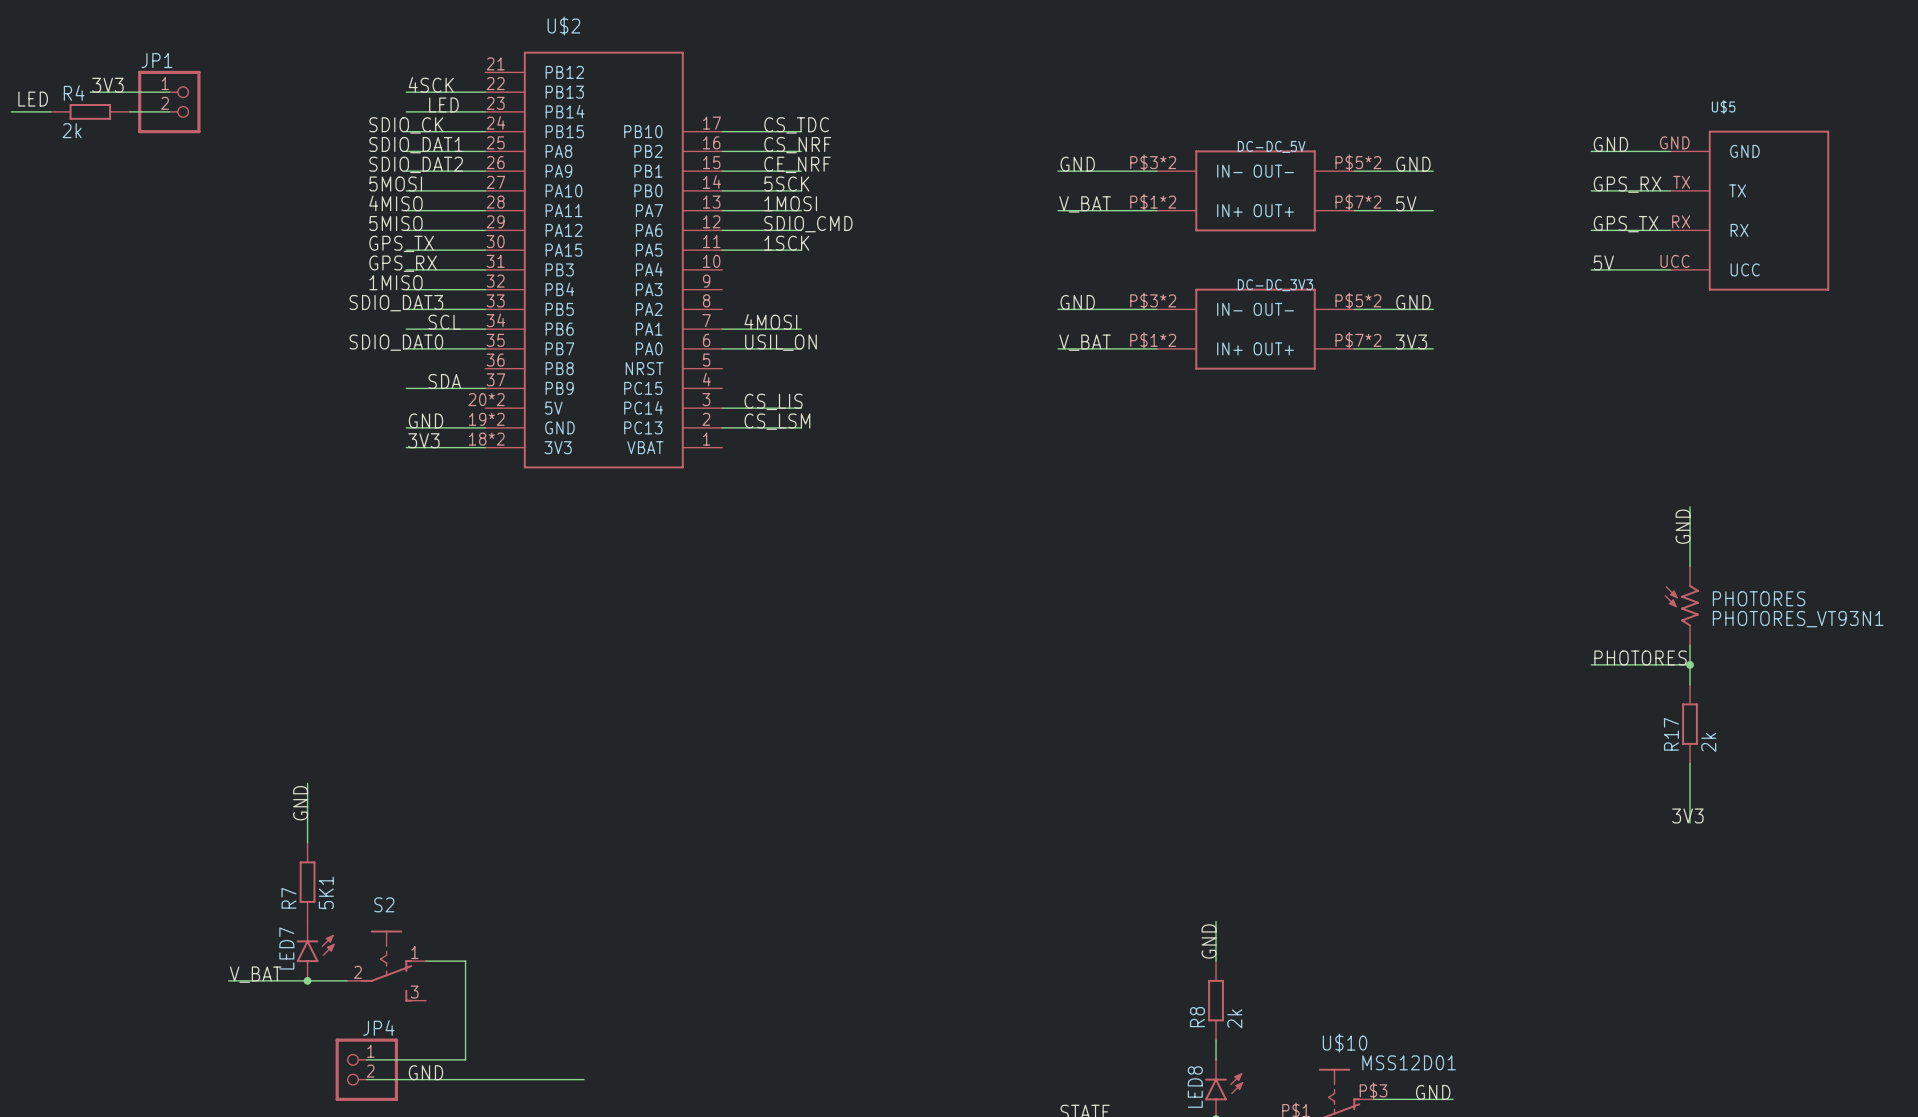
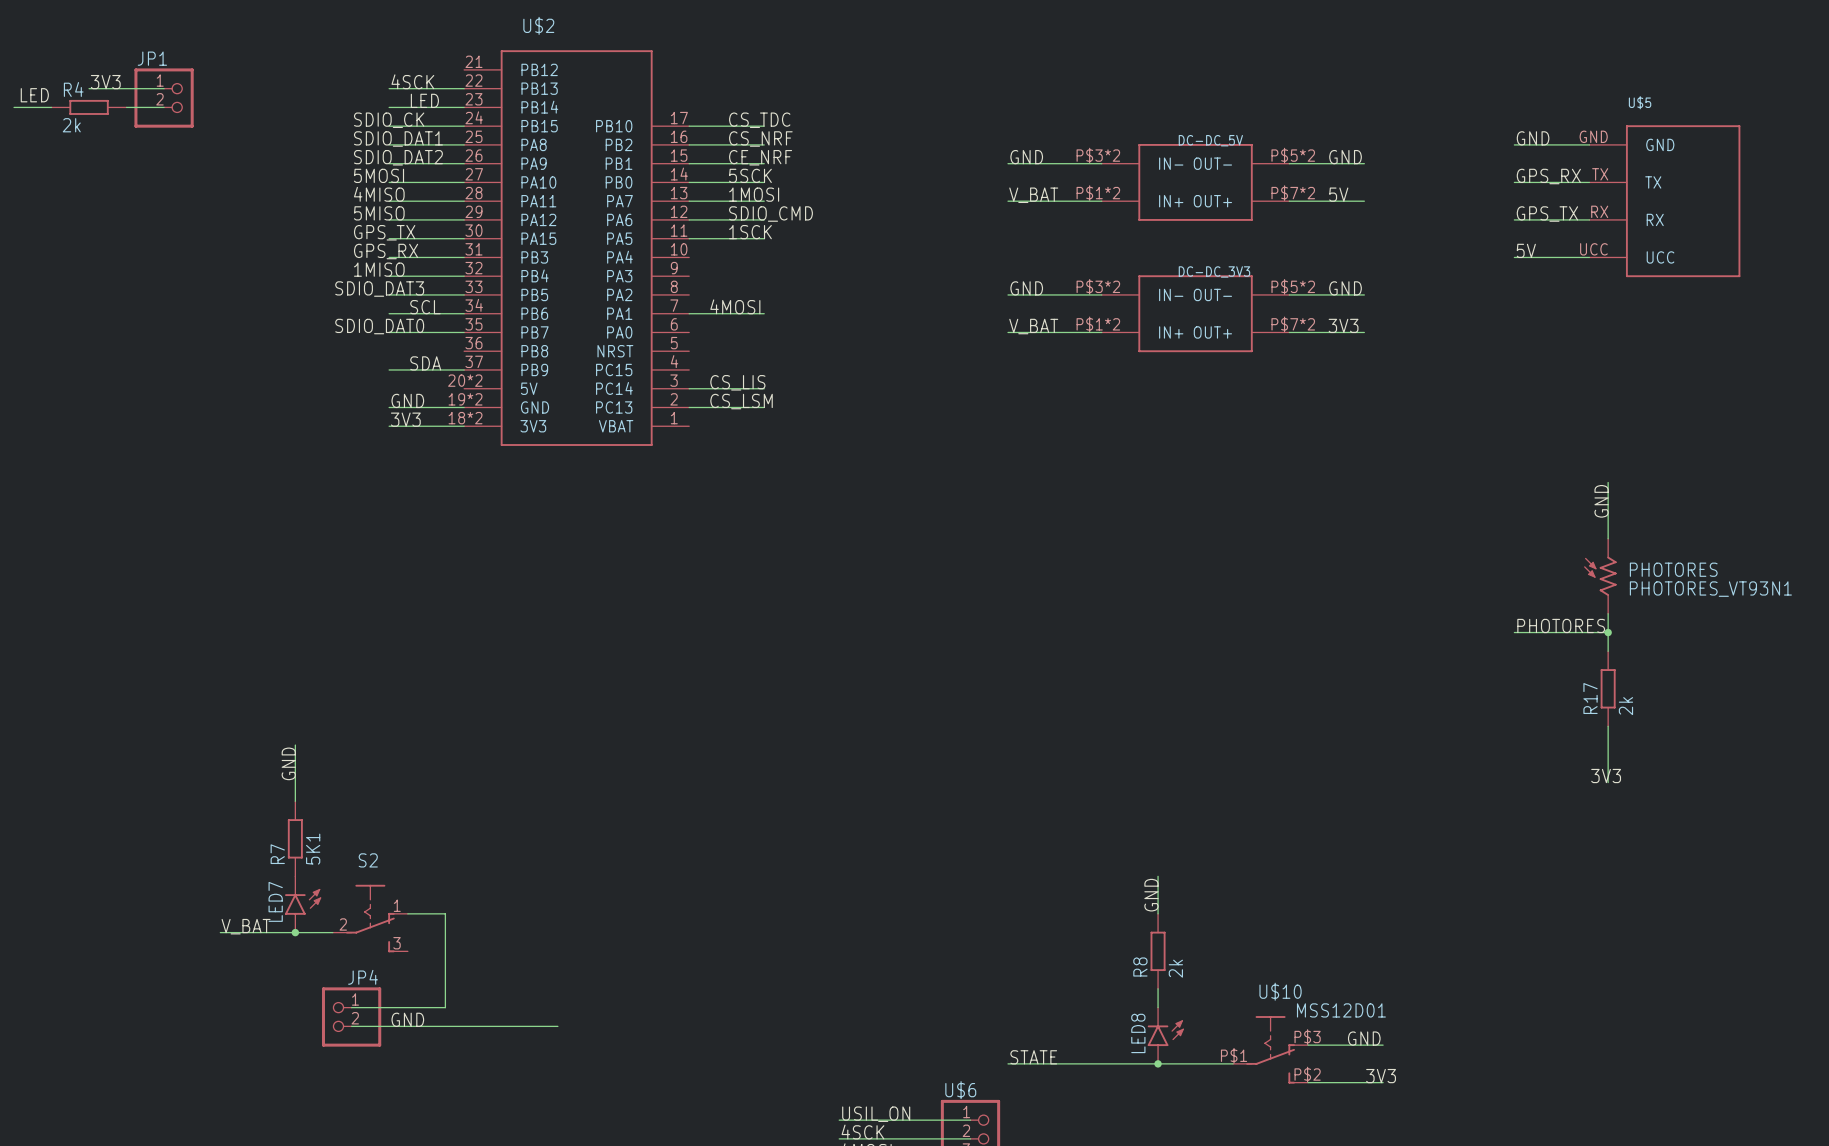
label: USIL_ON (780, 342) -> none
wire: (722, 348) (801, 348) -> none

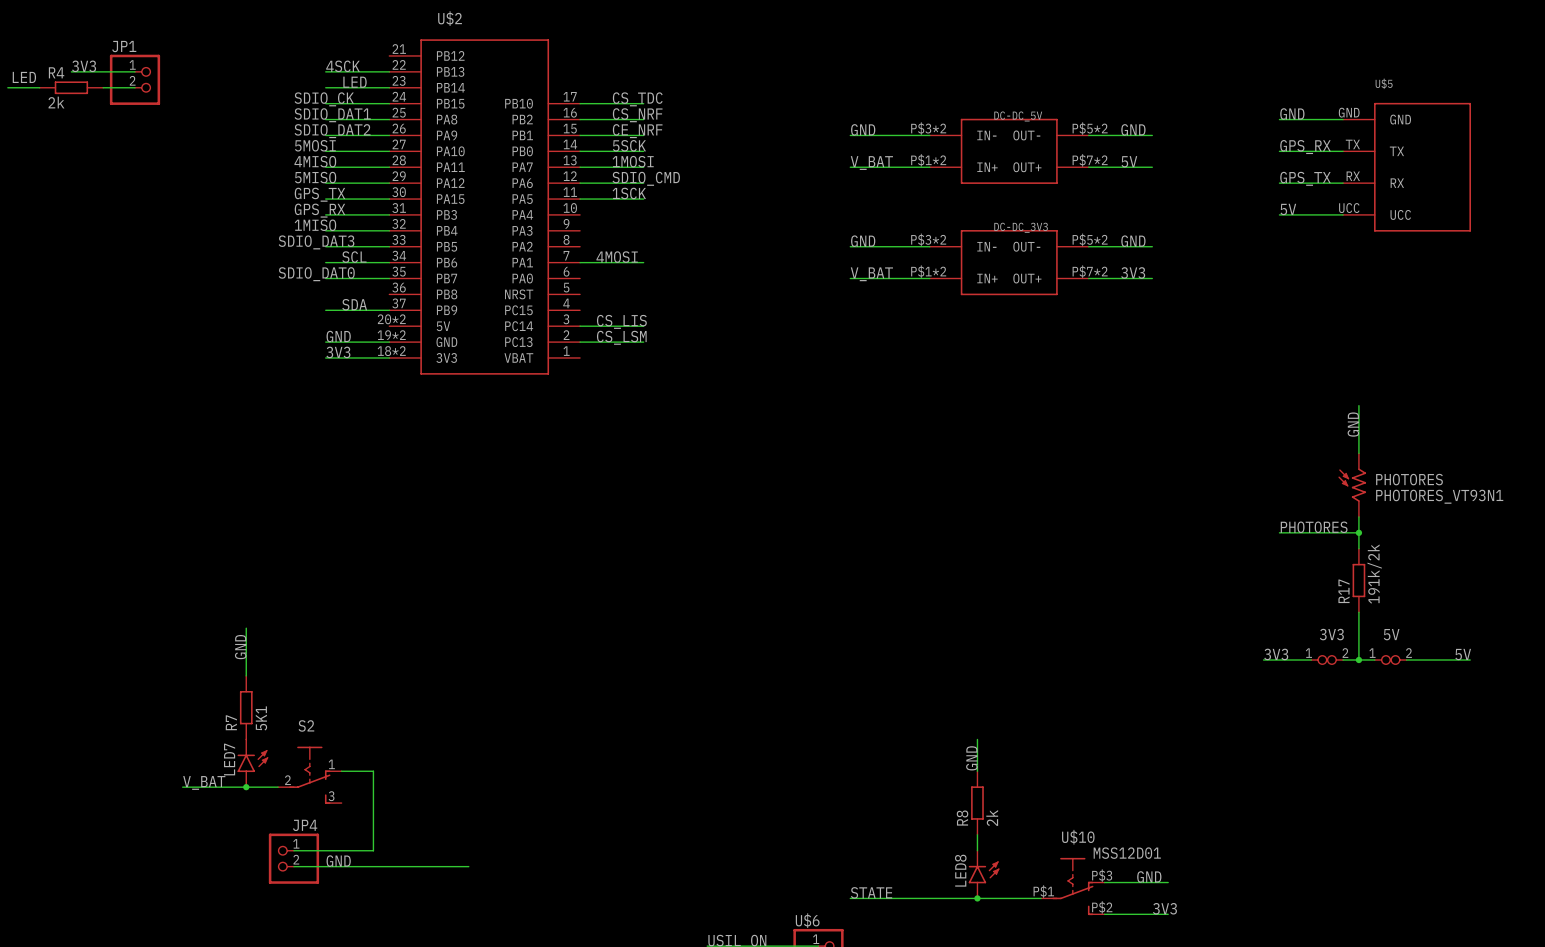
R17 value: 2k (1625, 706) -> 191k/2k (1374, 574)
label position: 3V3 (1606, 776) -> 3V3 (1276, 654)
label: none -> 5V (1463, 654)
wire: none -> (1263, 660) (1311, 660)
3V3: none -> (1327, 660)
wire: none -> (1343, 660) (1374, 660)
junction: none -> (1358, 660)
5V: none -> (1390, 660)
wire: none -> (1406, 660) (1470, 660)

